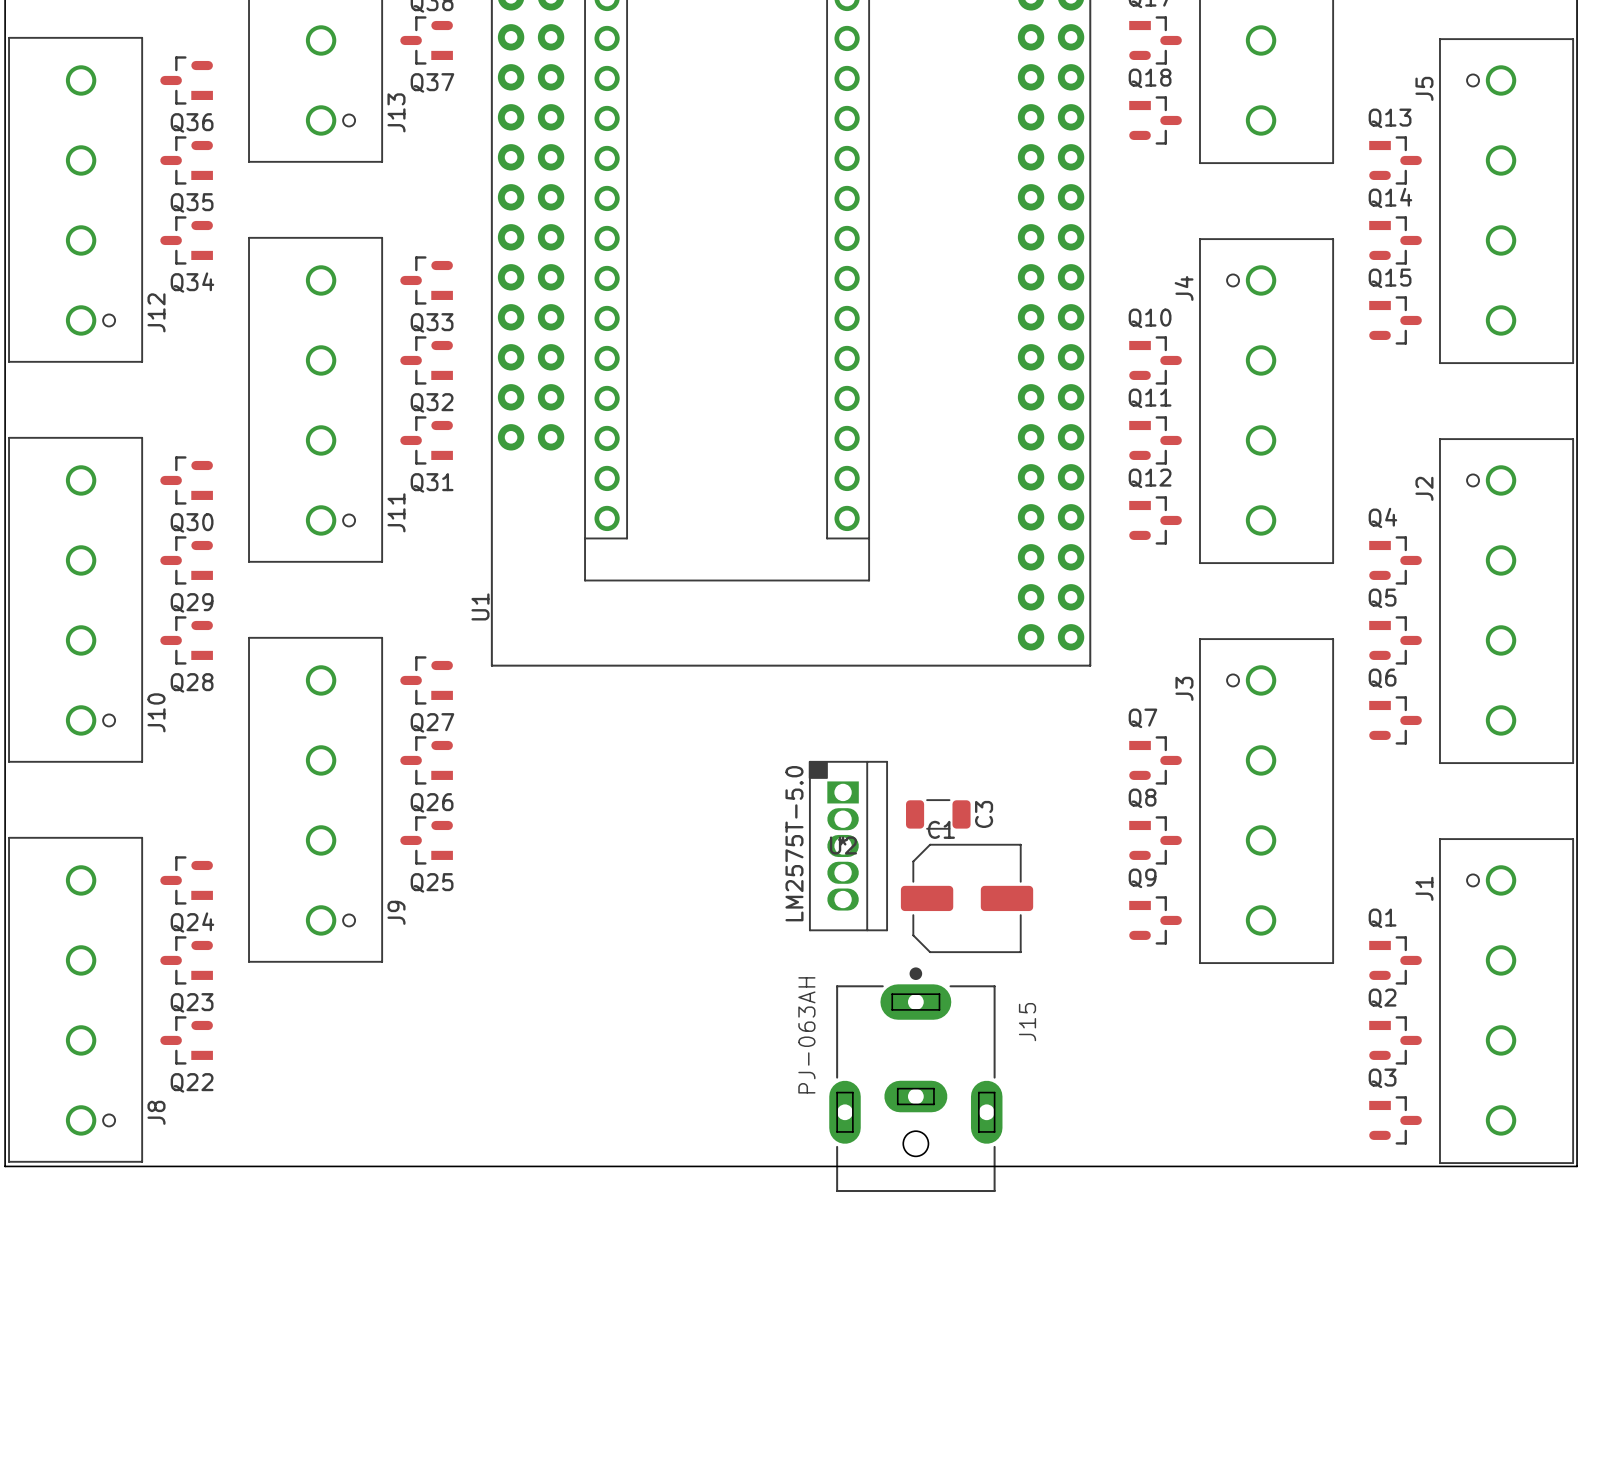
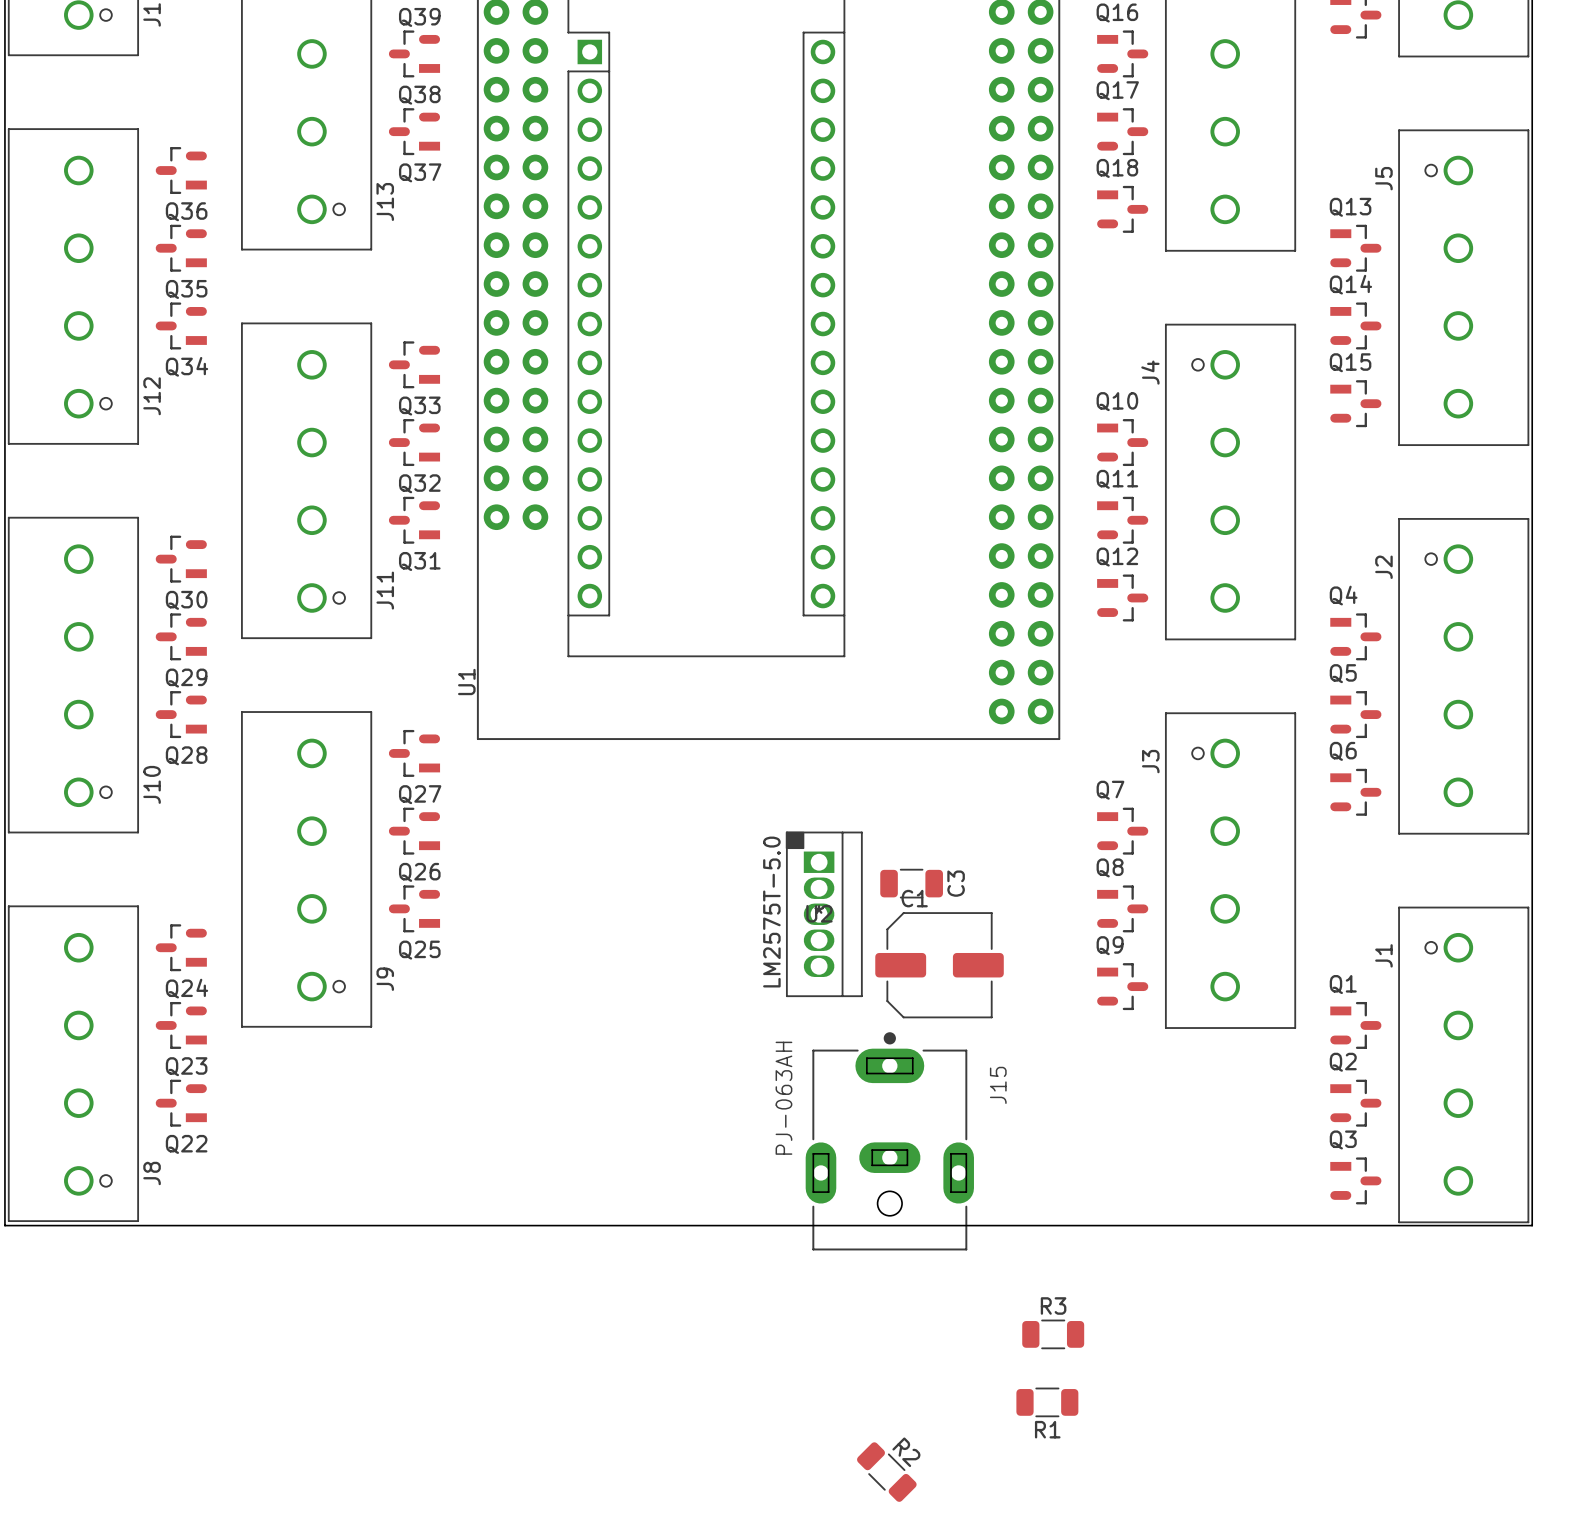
R3: none -> (1053, 1334)
R1: none -> (1047, 1402)
R2: none -> (886, 1472)

